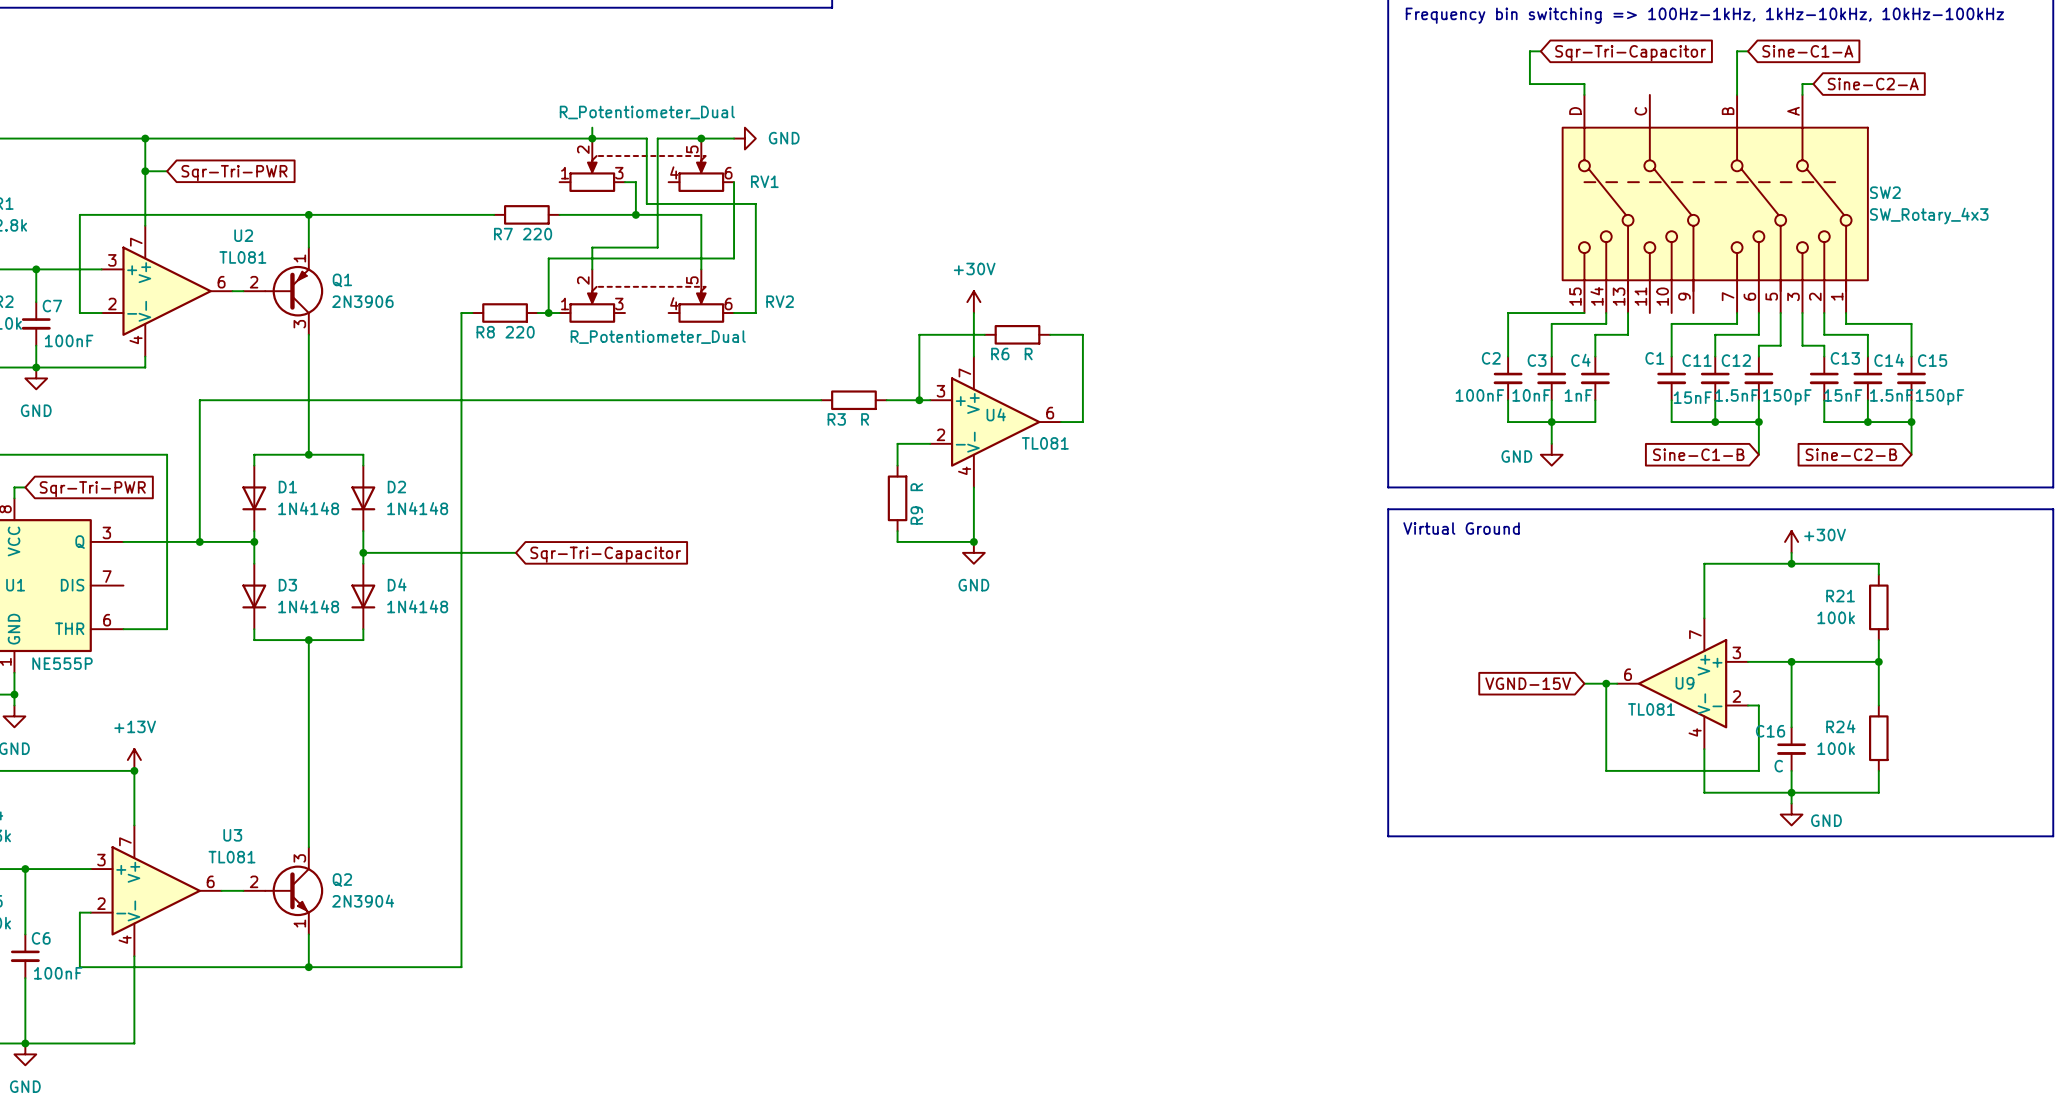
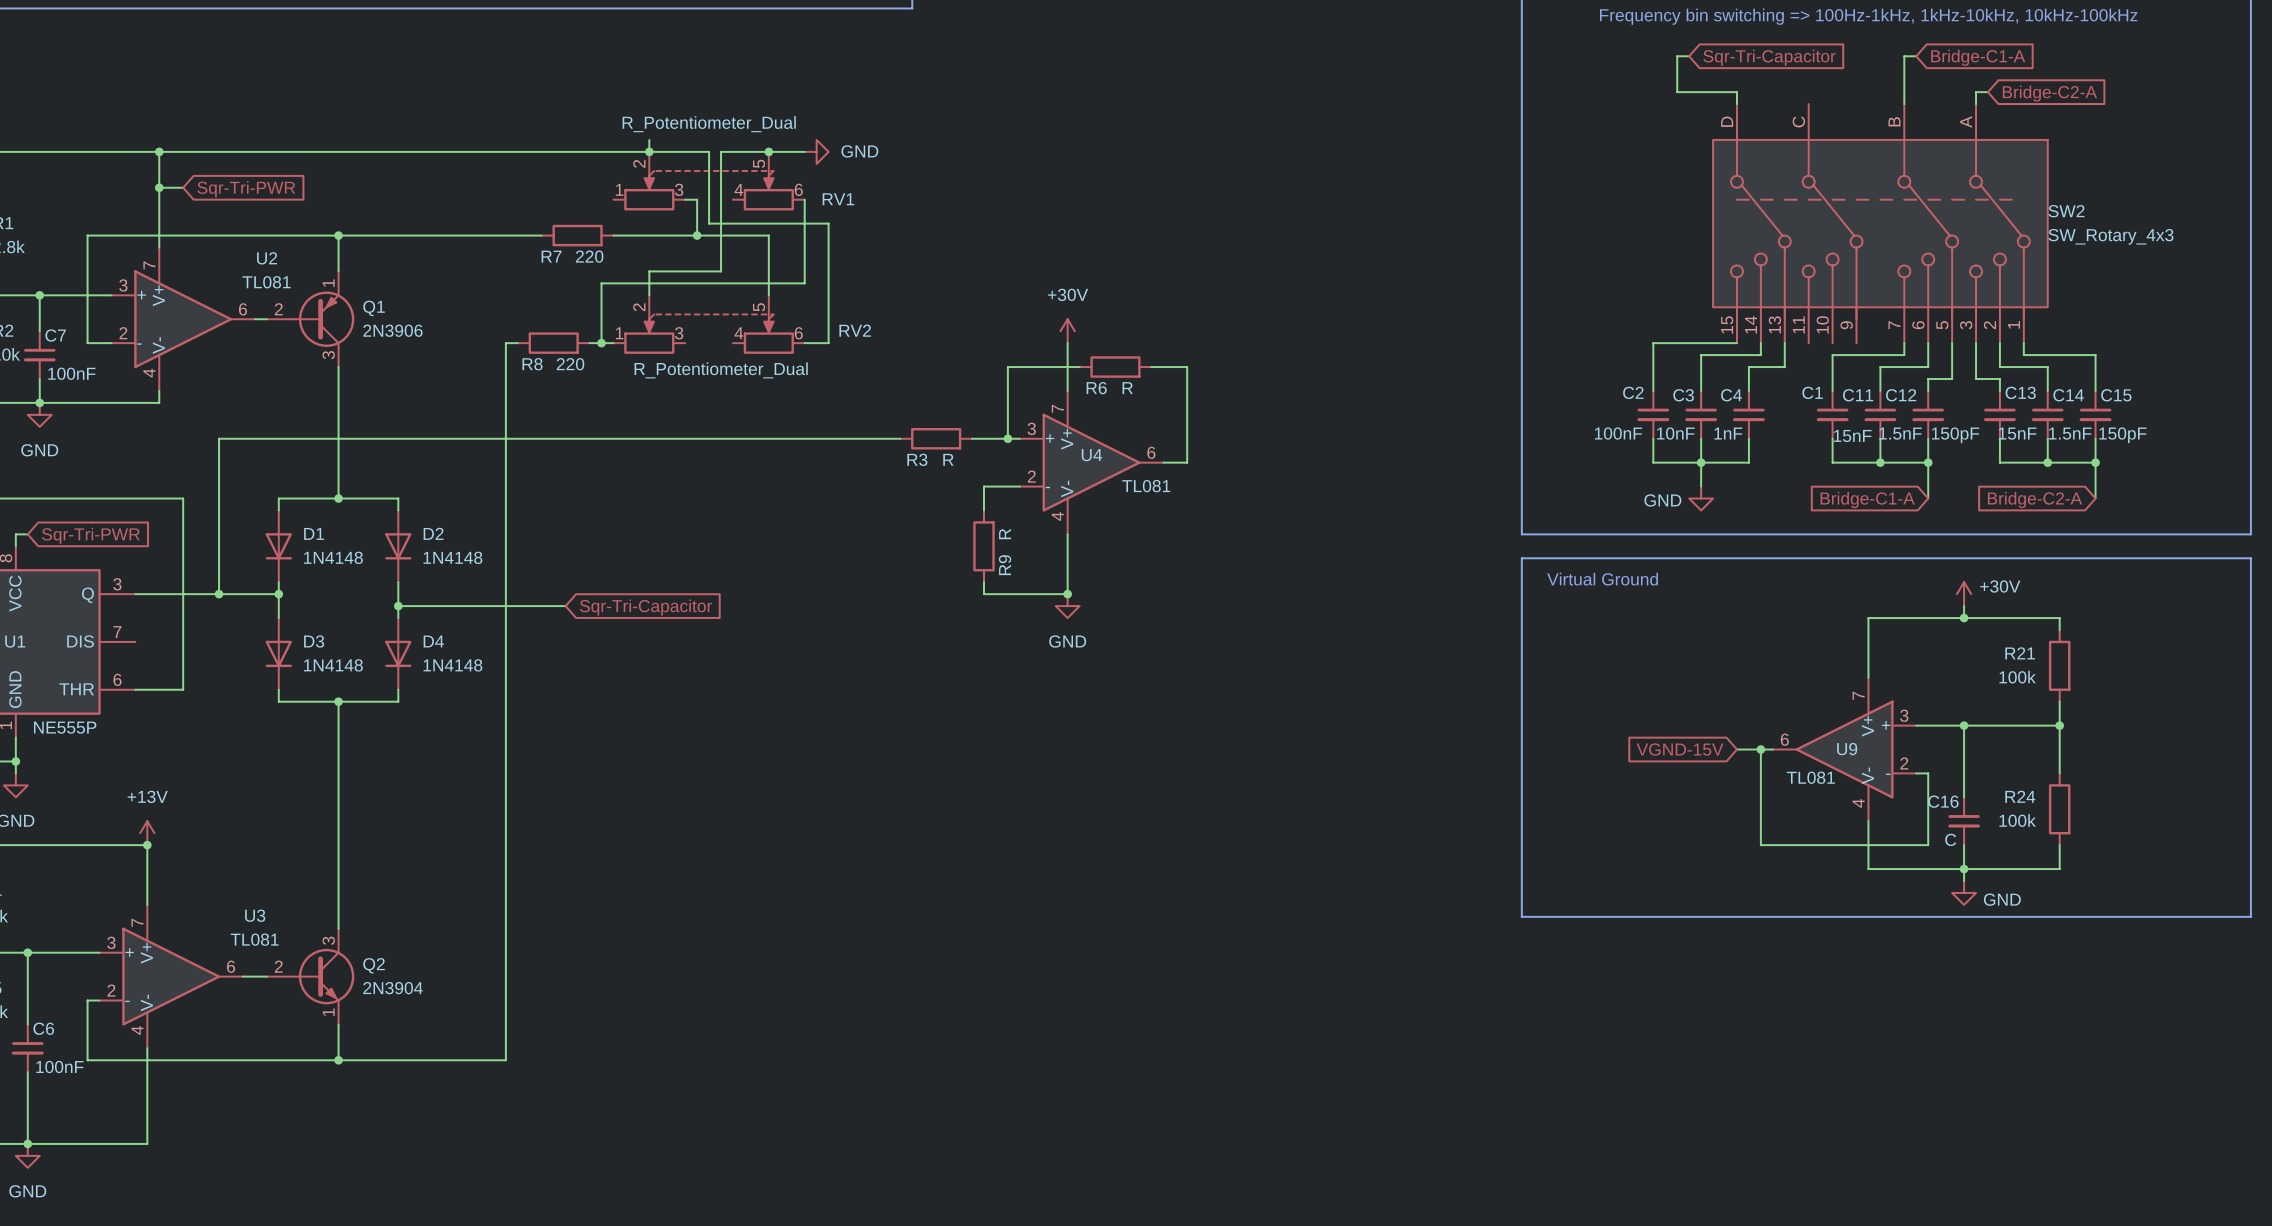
global label: Sine-C1-A (1807, 51) -> Bridge-C1-A (1978, 57)
global label: Sine-C2-A (1873, 84) -> Bridge-C2-A (2049, 93)
global label: Sine-C1-B (1698, 454) -> Bridge-C1-A (1867, 500)
global label: Sine-C2-B (1851, 454) -> Bridge-C2-A (2035, 500)

